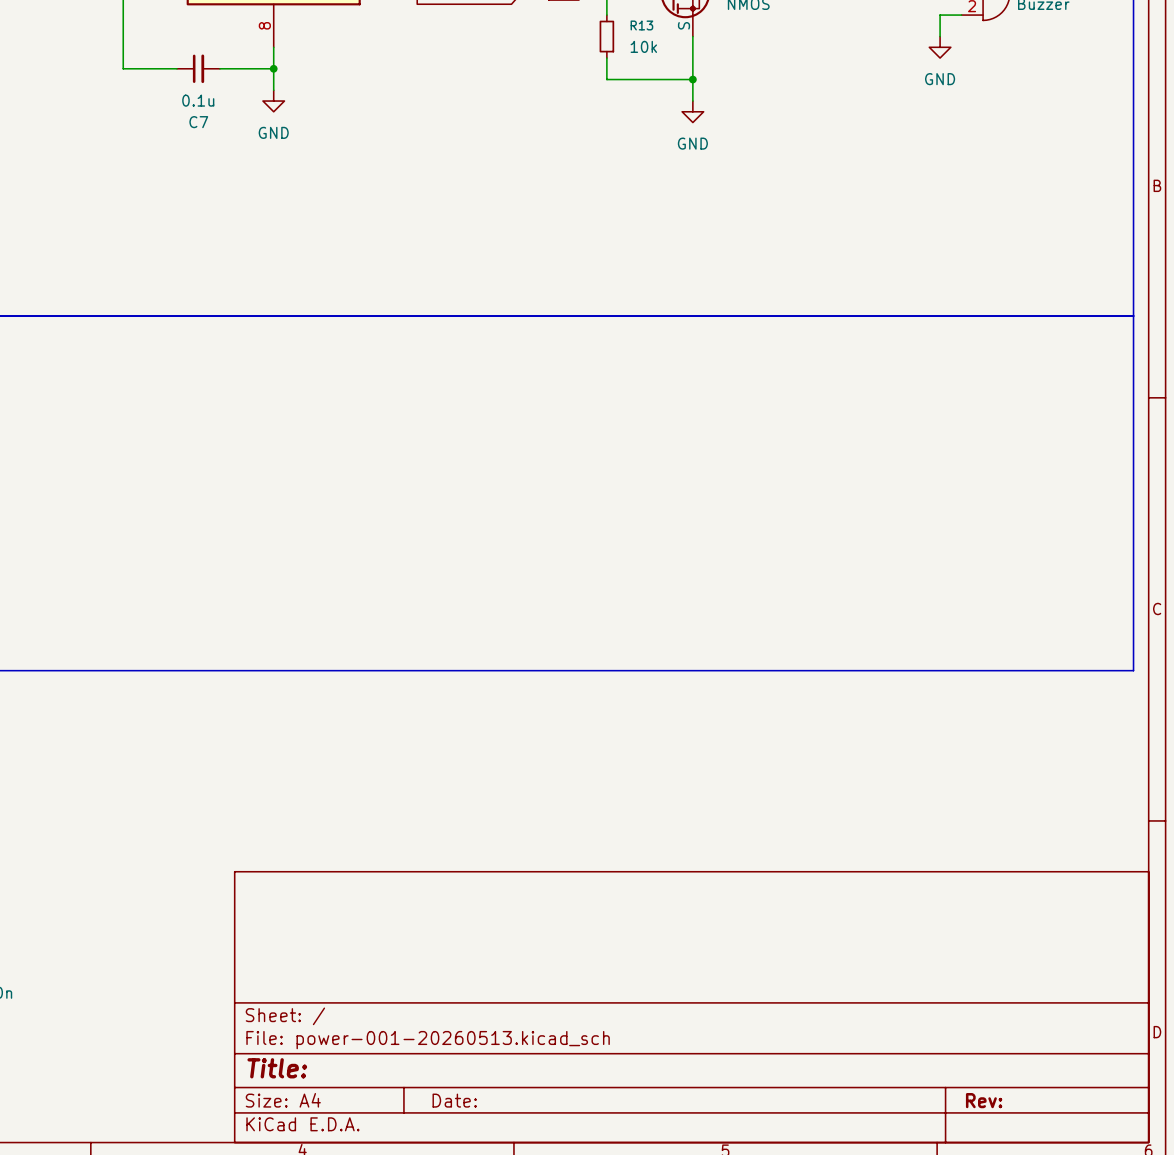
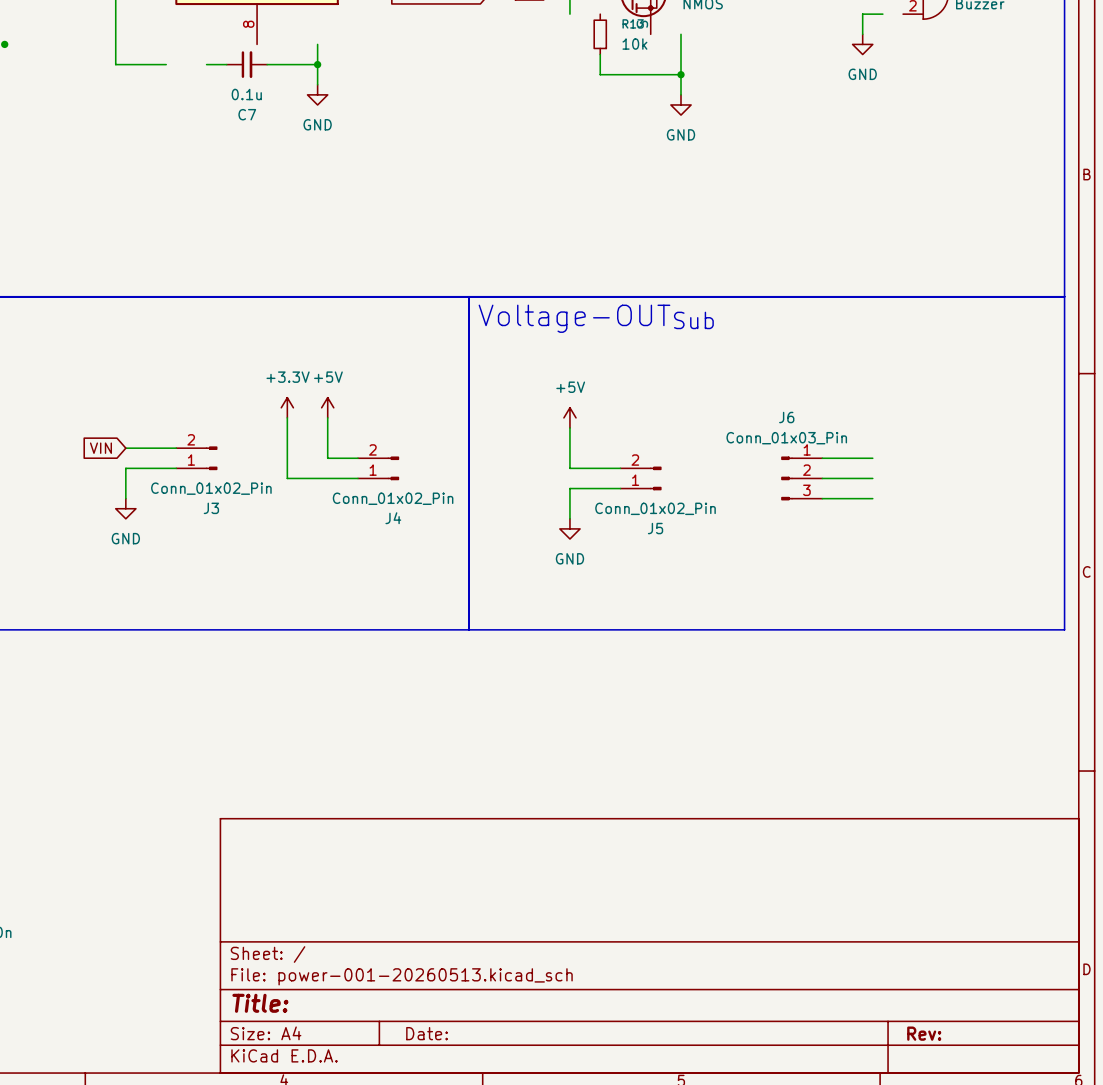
wire: (961, 15) (940, 15) (940, 36) -> (882, 14) (862, 14) (862, 34)
R13 position: (606, 36) -> (600, 34)
wire: (692, 36) (692, 101) -> (681, 34) (681, 94)
junction: none -> (4, 44)
wire: (273, 47) (273, 90) -> (317, 44) (317, 84)
power symbol position: GND (940, 47) -> GND (862, 44)
wire: (606, 58) (606, 79) (639, 79) -> (600, 54) (600, 74)
C7 position: (198, 68) -> (246, 64)
junction: (273, 68) -> none
wire: none -> (267, 64) (317, 64)
junction: none -> (317, 64)
wire: none -> (650, 74) (681, 74)
junction position: (692, 79) -> (681, 74)
power symbol position: GND (273, 101) -> GND (317, 94)
power symbol position: GND (692, 111) -> GND (681, 104)
line: none -> (469, 296) (469, 629)
text: none -> Voltage-OUTSub (596, 318)
power symbol: none -> +3.3V (287, 407)
power symbol: none -> +5V (327, 407)
wire: none -> (287, 417) (287, 478) (357, 478)
wire: none -> (327, 417) (327, 458) (357, 458)
power symbol: none -> +5V (569, 417)
wire: none -> (569, 427) (569, 468) (620, 468)
global label: none -> VIN (100, 448)
wire: none -> (125, 448) (176, 448)
J3: none -> Conn_01x02_Pin (196, 458)
wire: none -> (822, 458) (872, 458)
wire: none -> (176, 468) (125, 468) (125, 498)
J4: none -> Conn_01x02_Pin (378, 468)
J5: none -> Conn_01x02_Pin (640, 478)
J6: none -> Conn_01x03_Pin (801, 478)
wire: none -> (822, 478) (872, 478)
wire: none -> (620, 488) (569, 488) (569, 518)
wire: none -> (822, 498) (872, 498)
power symbol: none -> GND (125, 508)
power symbol: none -> GND (569, 528)

